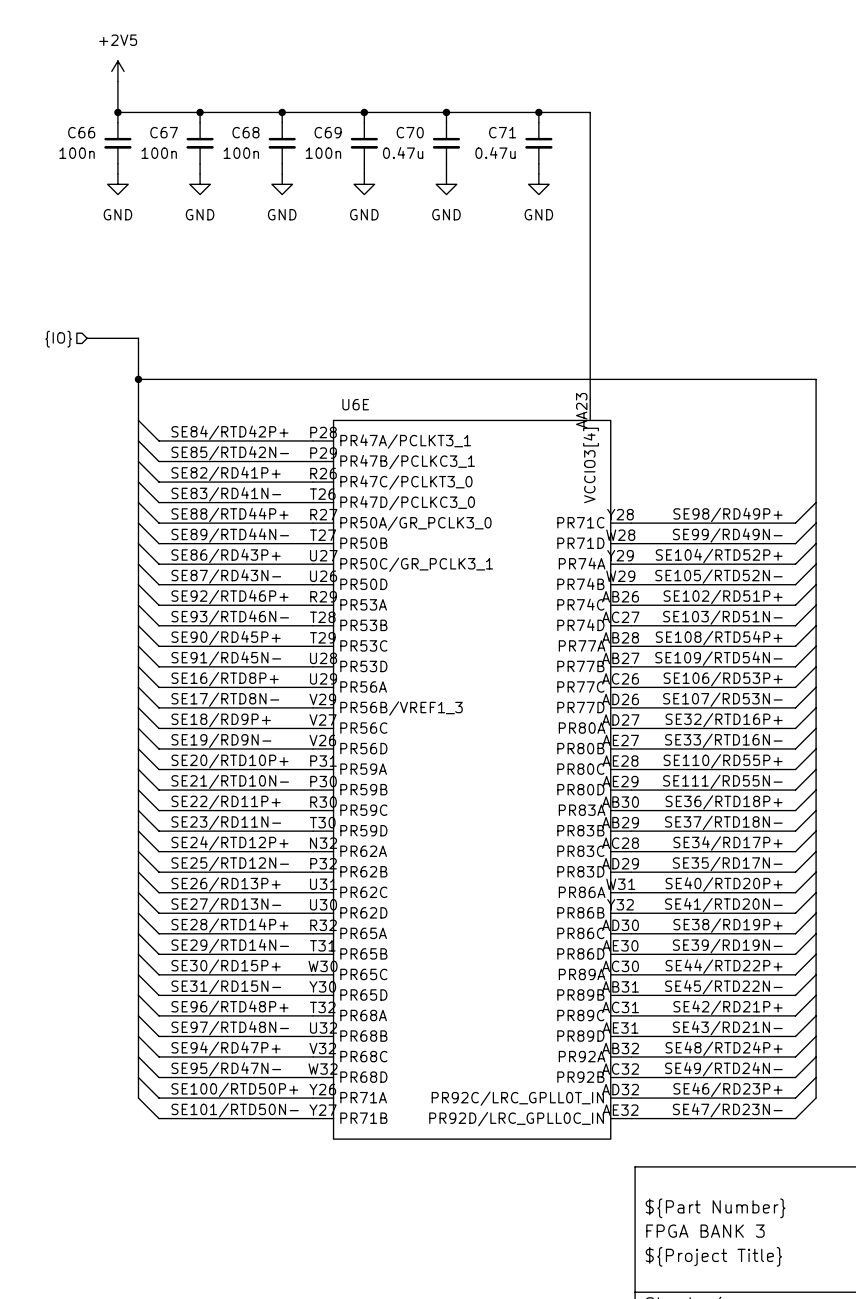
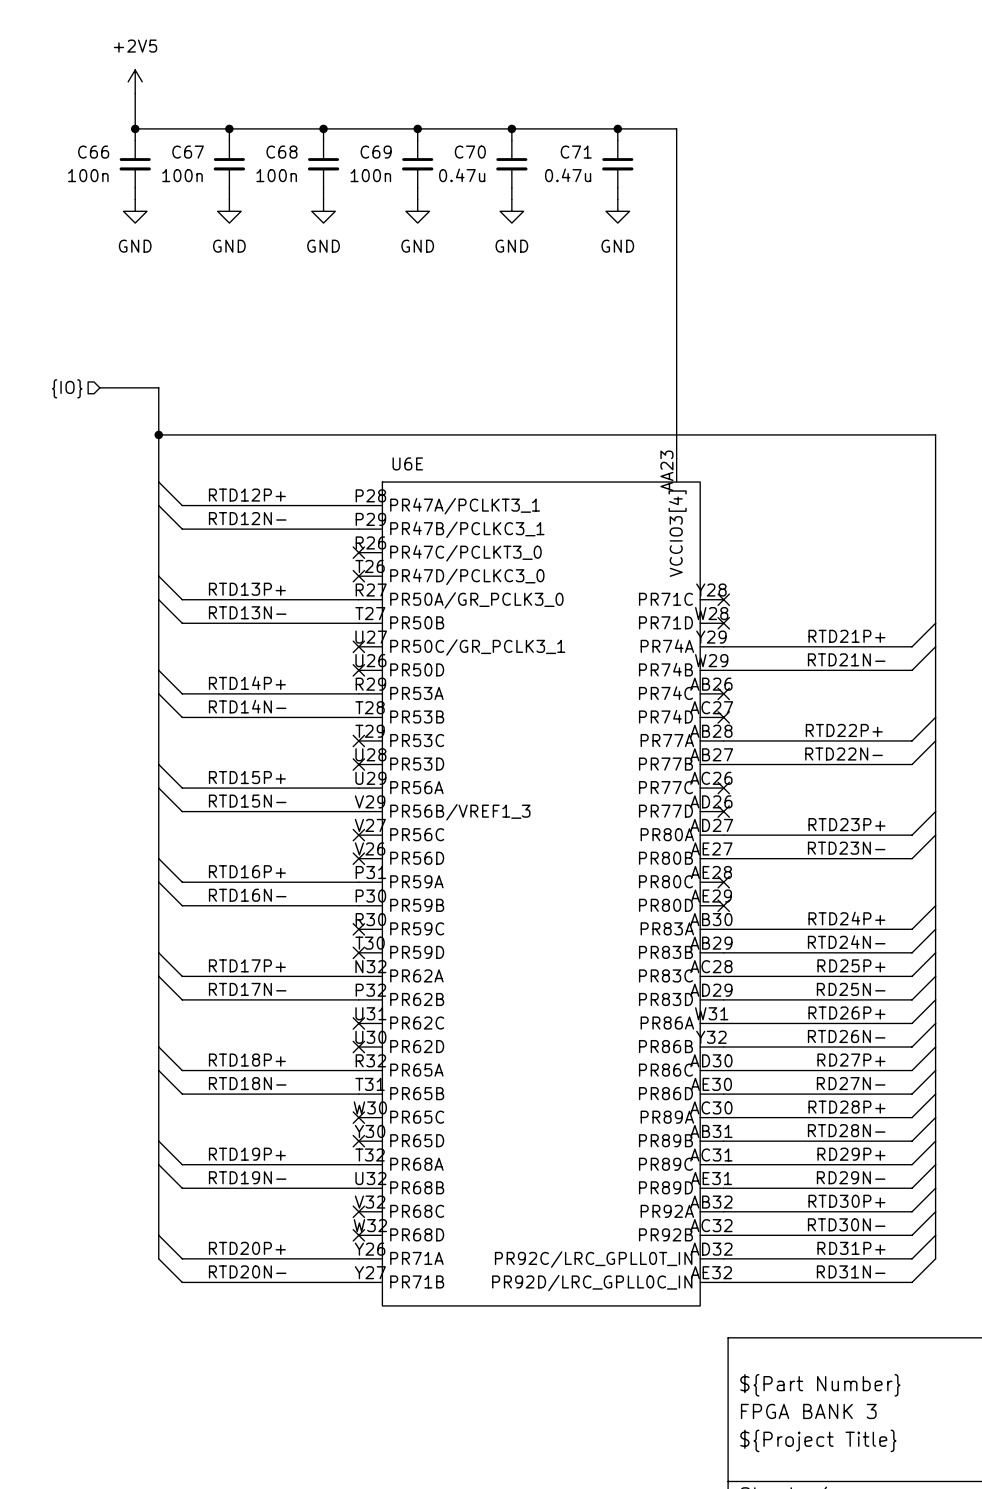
label: SE84/RTD42P+ (229, 432) -> RTD12P+ (247, 495)
label: SE85/RTD42N- (230, 453) -> RTD12N- (247, 518)
wire: (138, 461) (159, 482) (313, 482) -> none
label: SE82/RD41P+ (226, 473) -> none
wire: (138, 482) (159, 502) (313, 502) -> none
no-connect mark: none -> (358, 552)
label: SE83/RD41N- (226, 494) -> none
no-connect mark: none -> (358, 576)
wire: (816, 502) (795, 523) (631, 523) -> none
label: none -> RTD13P+ (247, 589)
label: SE88/RTD44P+ (229, 514) -> none
label: SE98/RD49P+ (727, 514) -> none
no-connect mark: none -> (723, 599)
wire: (816, 523) (795, 543) (631, 543) -> none
label: none -> RTD13N- (247, 612)
label: SE89/RTD44N- (230, 535) -> none
label: SE99/RD49N- (727, 535) -> none
wire: (138, 543) (159, 564) (313, 564) -> none
no-connect mark: none -> (723, 623)
label: SE86/RD43P+ (226, 555) -> none
label: SE104/RTD52P+ (719, 555) -> none
label: none -> RTD21P+ (846, 636)
wire: (138, 564) (159, 584) (313, 584) -> none
no-connect mark: none -> (358, 646)
label: none -> RTD21N- (846, 659)
label: SE87/RD43N- (226, 576) -> none
label: SE105/RTD52N- (718, 576) -> none
no-connect mark: none -> (358, 670)
wire: (816, 584) (795, 605) (631, 605) -> none
label: SE92/RTD46P+ (229, 597) -> RTD14P+ (247, 683)
label: SE102/RD51P+ (723, 597) -> none
no-connect mark: none -> (723, 693)
wire: (816, 605) (795, 625) (631, 625) -> none
label: SE93/RTD46N- (230, 617) -> RTD14N- (247, 706)
label: SE103/RD51N- (722, 617) -> none
wire: (138, 625) (159, 646) (313, 646) -> none
no-connect mark: none -> (723, 717)
label: none -> RTD22P+ (844, 730)
label: SE90/RD45P+ (226, 638) -> none
label: SE108/RTD54P+ (719, 638) -> none
wire: (138, 646) (159, 666) (313, 666) -> none
no-connect mark: none -> (358, 740)
label: none -> RTD22N- (844, 754)
label: SE91/RD45N- (226, 658) -> none
label: SE109/RTD54N- (718, 658) -> none
no-connect mark: none -> (358, 764)
wire: (816, 666) (795, 687) (631, 687) -> none
label: none -> RTD15P+ (247, 777)
label: SE16/RTD8P+ (225, 679) -> none
label: SE106/RD53P+ (723, 679) -> none
no-connect mark: none -> (723, 788)
wire: (816, 687) (795, 707) (631, 707) -> none
label: none -> RTD15N- (247, 801)
label: SE17/RTD8N- (225, 699) -> none
label: SE107/RD53N- (722, 699) -> none
wire: (138, 707) (159, 728) (313, 728) -> none
no-connect mark: none -> (723, 811)
label: none -> RTD23P+ (846, 824)
label: SE18/RD9P+ (221, 720) -> none
label: SE32/RTD16P+ (724, 720) -> none
wire: (138, 728) (159, 748) (313, 748) -> none
no-connect mark: none -> (358, 835)
label: none -> RTD23N- (846, 848)
label: SE19/RD9N- (221, 740) -> none
label: SE33/RTD16N- (723, 740) -> none
no-connect mark: none -> (358, 858)
wire: (816, 748) (795, 769) (631, 769) -> none
label: SE20/RTD10P+ (229, 761) -> RTD16P+ (247, 871)
label: SE110/RD55P+ (723, 761) -> none
no-connect mark: none -> (723, 882)
wire: (816, 769) (795, 790) (631, 790) -> none
label: SE21/RTD10N- (230, 781) -> RTD16N- (247, 895)
label: SE111/RD55N- (722, 781) -> none
wire: (138, 790) (159, 810) (313, 810) -> none
no-connect mark: none -> (723, 905)
label: none -> RTD24P+ (846, 918)
label: SE22/RD11P+ (226, 802) -> none
label: SE36/RTD18P+ (724, 802) -> none
wire: (138, 810) (159, 831) (313, 831) -> none
no-connect mark: none -> (358, 929)
label: none -> RTD24N- (846, 942)
label: SE23/RD11N- (226, 822) -> none
label: SE37/RTD18N- (723, 822) -> none
no-connect mark: none -> (358, 952)
label: none -> RD25P+ (851, 965)
label: SE24/RTD12P+ (229, 843) -> RTD17P+ (247, 965)
label: SE34/RD17P+ (727, 843) -> none
label: SE25/RTD12N- (230, 863) -> RTD17N- (247, 989)
label: SE35/RD17N- (727, 863) -> none
label: none -> RD25N- (851, 989)
wire: (138, 872) (159, 892) (313, 892) -> none
label: SE26/RD13P+ (226, 884) -> none
label: SE40/RTD20P+ (724, 884) -> RTD26P+ (846, 1012)
wire: (138, 892) (159, 913) (313, 913) -> none
no-connect mark: none -> (358, 1023)
label: SE27/RD13N- (226, 905) -> none
label: SE41/RTD20N- (723, 905) -> RTD26N- (846, 1036)
no-connect mark: none -> (358, 1047)
label: none -> RD27P+ (851, 1060)
label: SE28/RTD14P+ (229, 925) -> RTD18P+ (247, 1060)
label: SE38/RD19P+ (727, 925) -> none
label: none -> RD27N- (851, 1083)
label: SE29/RTD14N- (230, 946) -> RTD18N- (247, 1083)
label: SE39/RD19N- (727, 946) -> none
wire: (138, 954) (159, 974) (313, 974) -> none
label: SE30/RD15P+ (226, 966) -> none
label: SE44/RTD22P+ (724, 966) -> RTD28P+ (846, 1107)
wire: (138, 974) (159, 995) (313, 995) -> none
no-connect mark: none -> (358, 1117)
label: SE31/RD15N- (226, 987) -> none
label: SE45/RTD22N- (723, 987) -> RTD28N- (846, 1130)
no-connect mark: none -> (358, 1141)
label: none -> RTD19P+ (247, 1154)
label: none -> RD29P+ (851, 1154)
label: SE96/RTD48P+ (229, 1007) -> none
label: SE42/RD21P+ (727, 1007) -> none
label: none -> RTD19N- (247, 1177)
label: none -> RD29N- (851, 1177)
label: SE97/RTD48N- (230, 1028) -> none
label: SE43/RD21N- (727, 1028) -> none
wire: (138, 1036) (159, 1056) (313, 1056) -> none
label: none -> RTD30P+ (846, 1201)
label: SE94/RD47P+ (226, 1048) -> none
label: SE48/RTD24P+ (724, 1048) -> none
wire: (138, 1056) (159, 1077) (313, 1077) -> none
no-connect mark: none -> (358, 1211)
label: none -> RTD30N- (846, 1224)
label: SE95/RD47N- (226, 1069) -> none
label: SE49/RTD24N- (723, 1069) -> none
no-connect mark: none -> (358, 1235)
label: none -> RTD20P+ (247, 1248)
label: none -> RD31P+ (851, 1248)
label: SE100/RTD50P+ (234, 1089) -> none
label: SE46/RD23P+ (727, 1089) -> none
label: none -> RTD20N- (247, 1271)
label: none -> RD31N- (851, 1271)
label: SE101/RTD50N- (235, 1110) -> none
label: SE47/RD23N- (727, 1110) -> none

